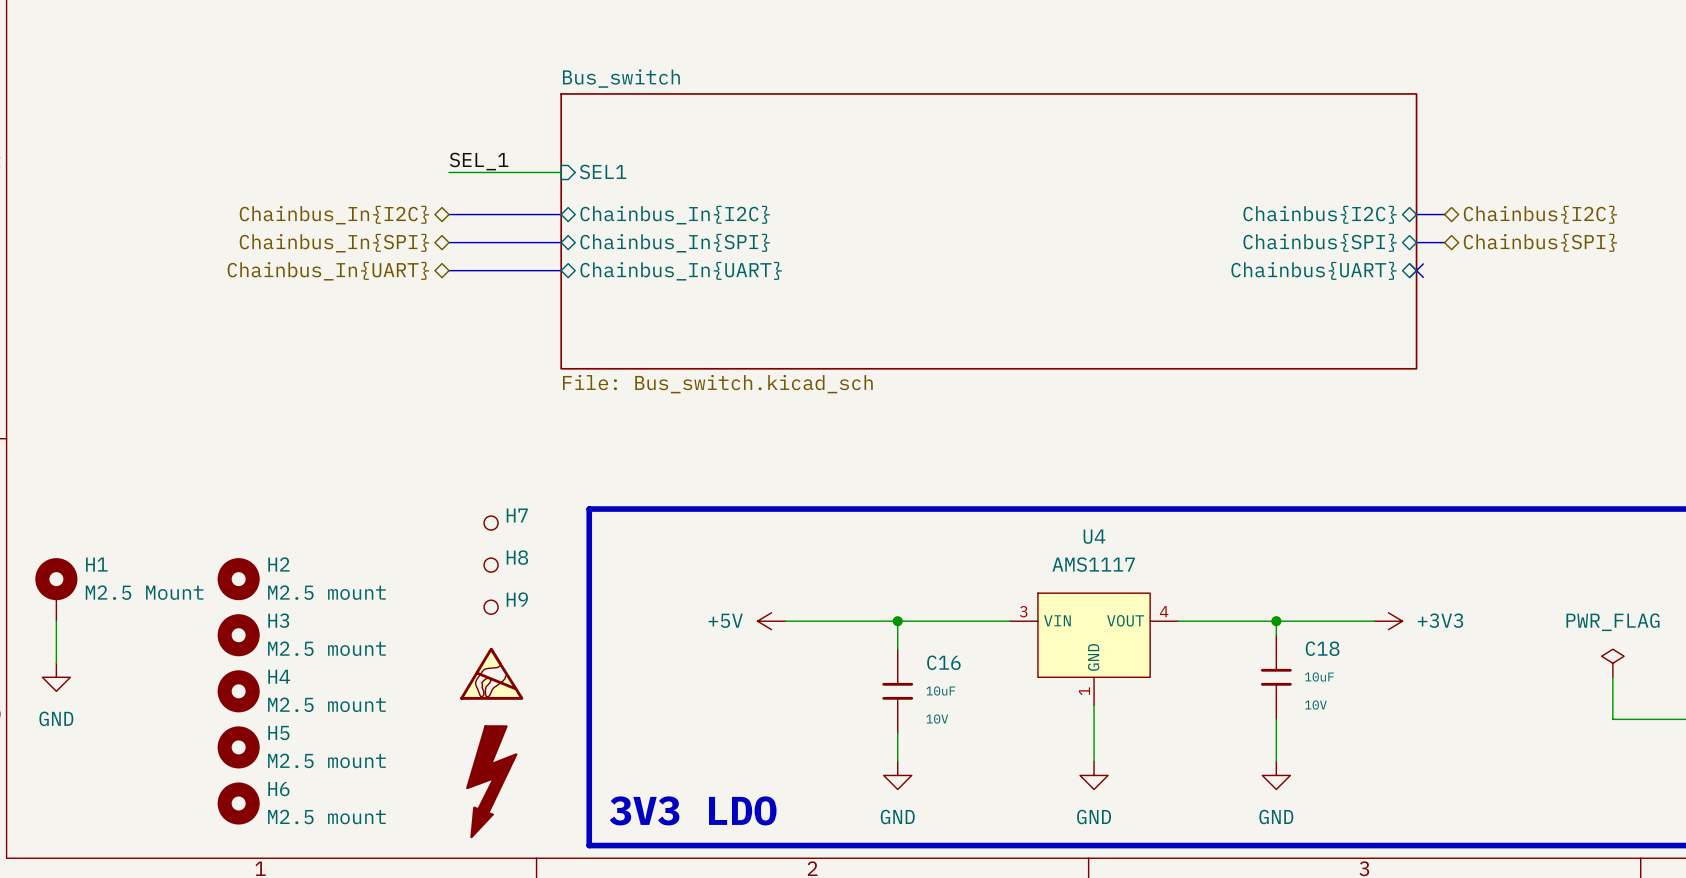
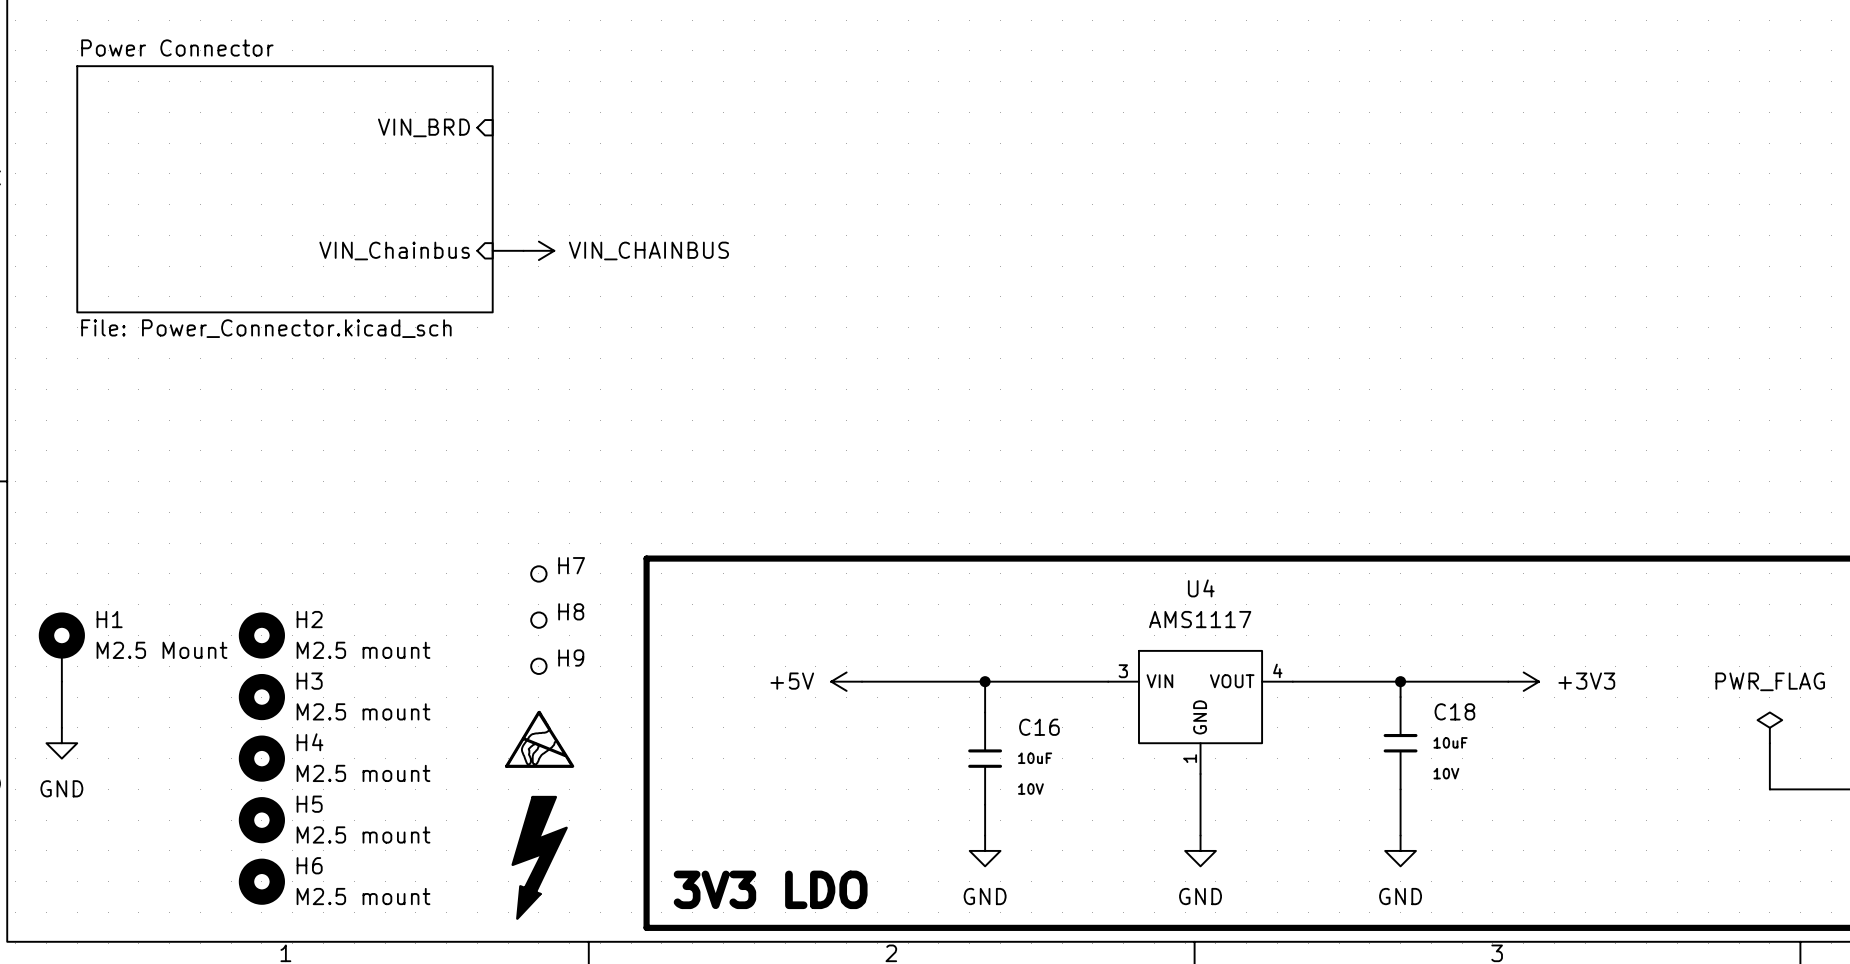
sheet pin: none -> VIN_BRD (423, 127)
label: SEL_1 (479, 161) -> none
sheet pin: SEL1 (603, 171) -> none
sheet Power Connector: none -> File: Power_Connector.kicad_sch (284, 189)
wire: (449, 172) (561, 172) -> none
bus: (449, 214) (561, 214) -> none
sheet pin: Chainbus{I2C} (1320, 214) -> none
bus: (1416, 214) (1444, 214) -> none
hierarchical label: Chainbus{I2C} (1540, 214) -> none
hierarchical label: Chainbus_In{I2C} (334, 215) -> none
sheet pin: Chainbus_In{I2C} (675, 215) -> none
wire: none -> (492, 250) (523, 250)
power symbol: none -> VIN_CHAINBUS (538, 250)
sheet pin: none -> VIN_Chainbus (394, 250)
sheet Bus_switch: File: Bus_switch.kicad_sch (988, 231) -> none
bus: (449, 242) (561, 242) -> none
sheet pin: Chainbus{SPI} (1320, 242) -> none
bus: (1416, 242) (1444, 242) -> none
hierarchical label: Chainbus{SPI} (1540, 242) -> none
hierarchical label: Chainbus_In{SPI} (334, 243) -> none
sheet pin: Chainbus_In{SPI} (675, 243) -> none
bus: (449, 270) (561, 270) -> none
sheet pin: Chainbus{UART} (1314, 270) -> none
no-connect mark: (1416, 270) -> none
hierarchical label: Chainbus_In{UART} (328, 271) -> none
sheet pin: Chainbus_In{UART} (681, 271) -> none

